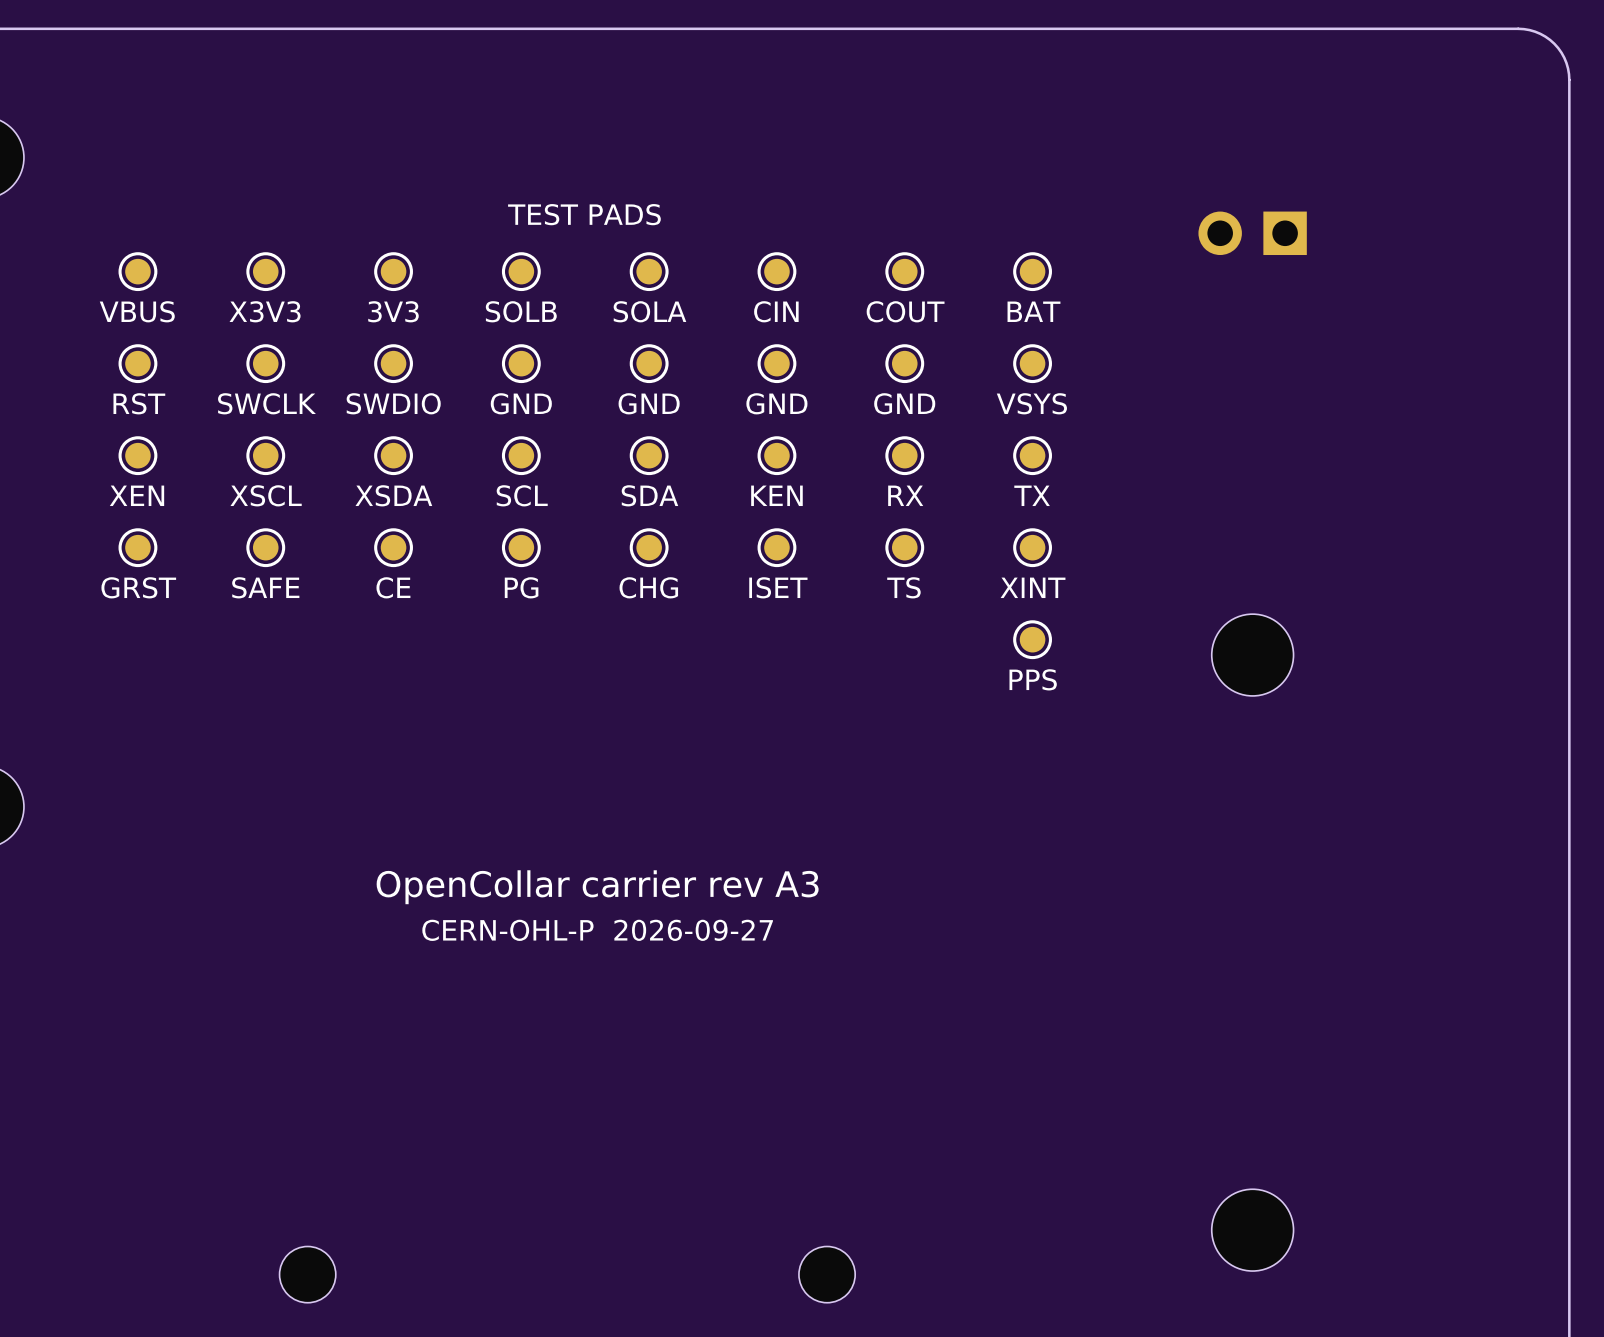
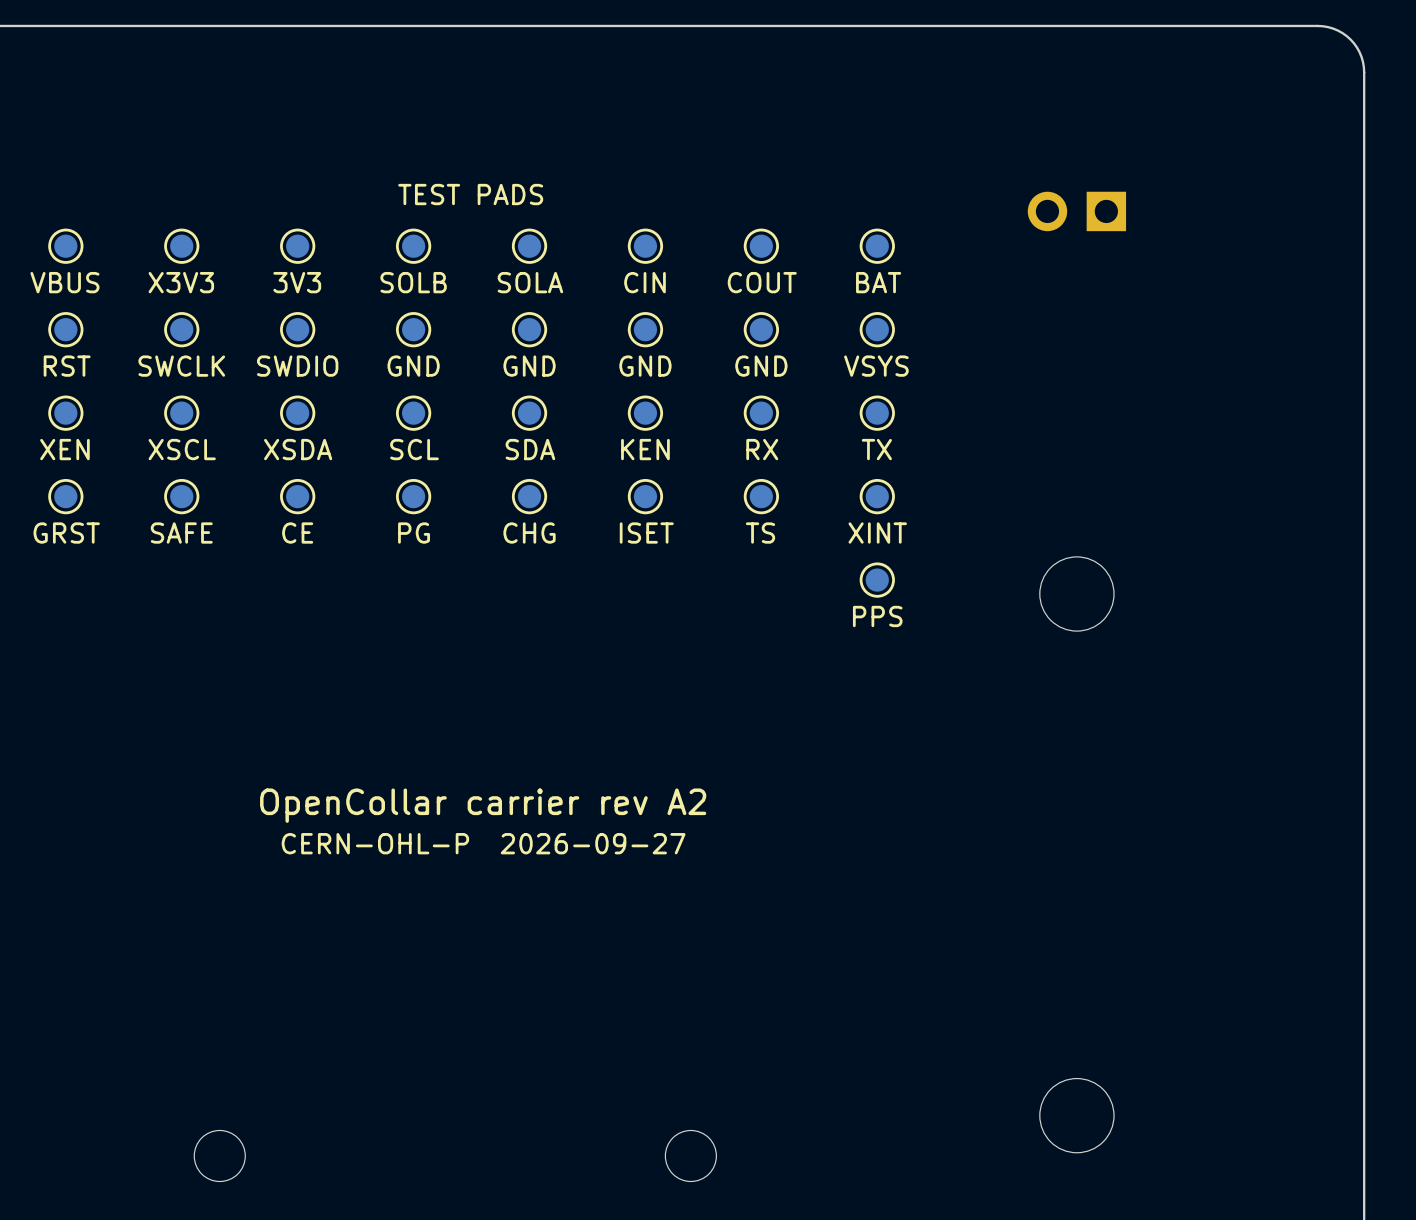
text: OpenCollar carrier rev A3 (597, 887) -> OpenCollar carrier rev A2 (483, 805)

